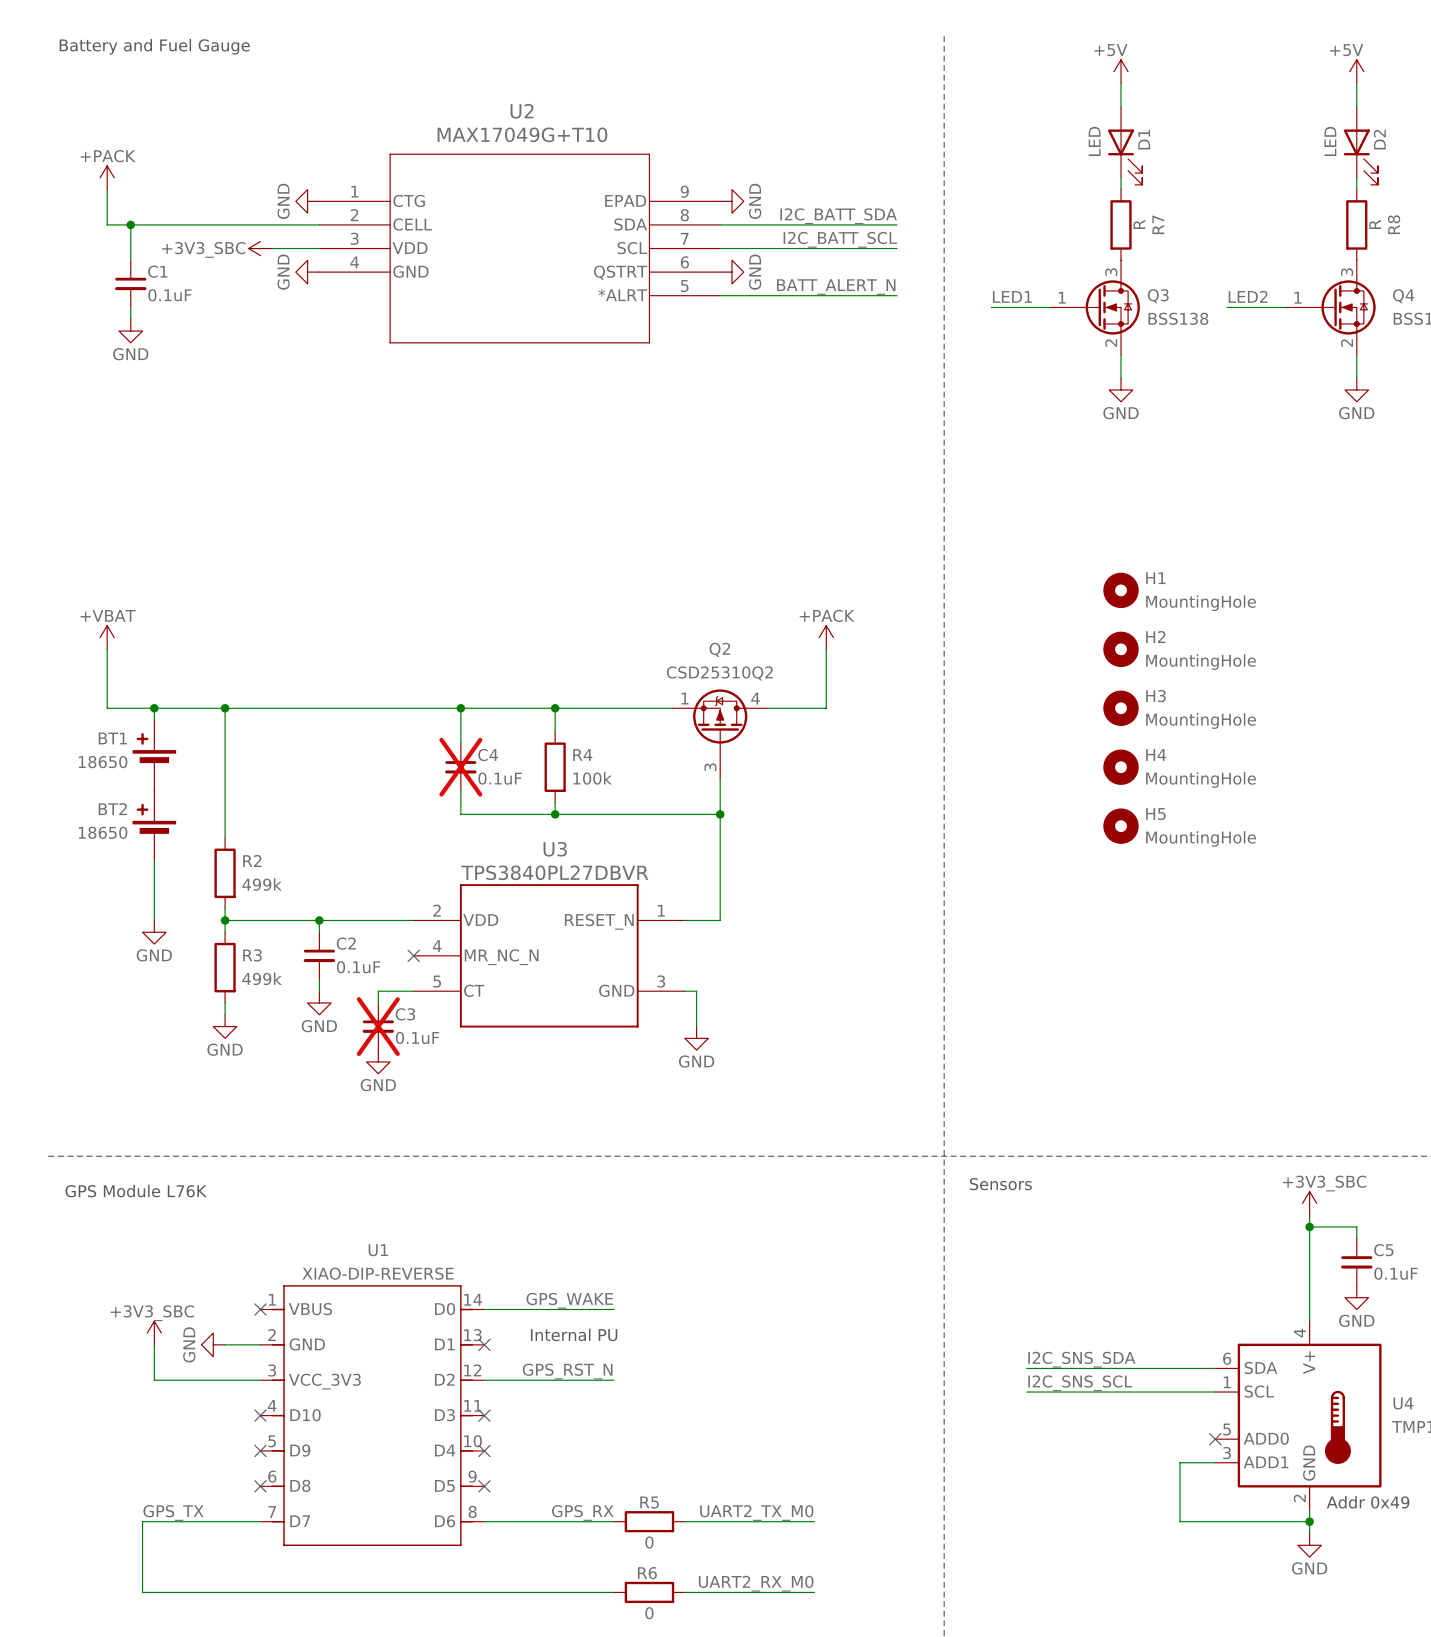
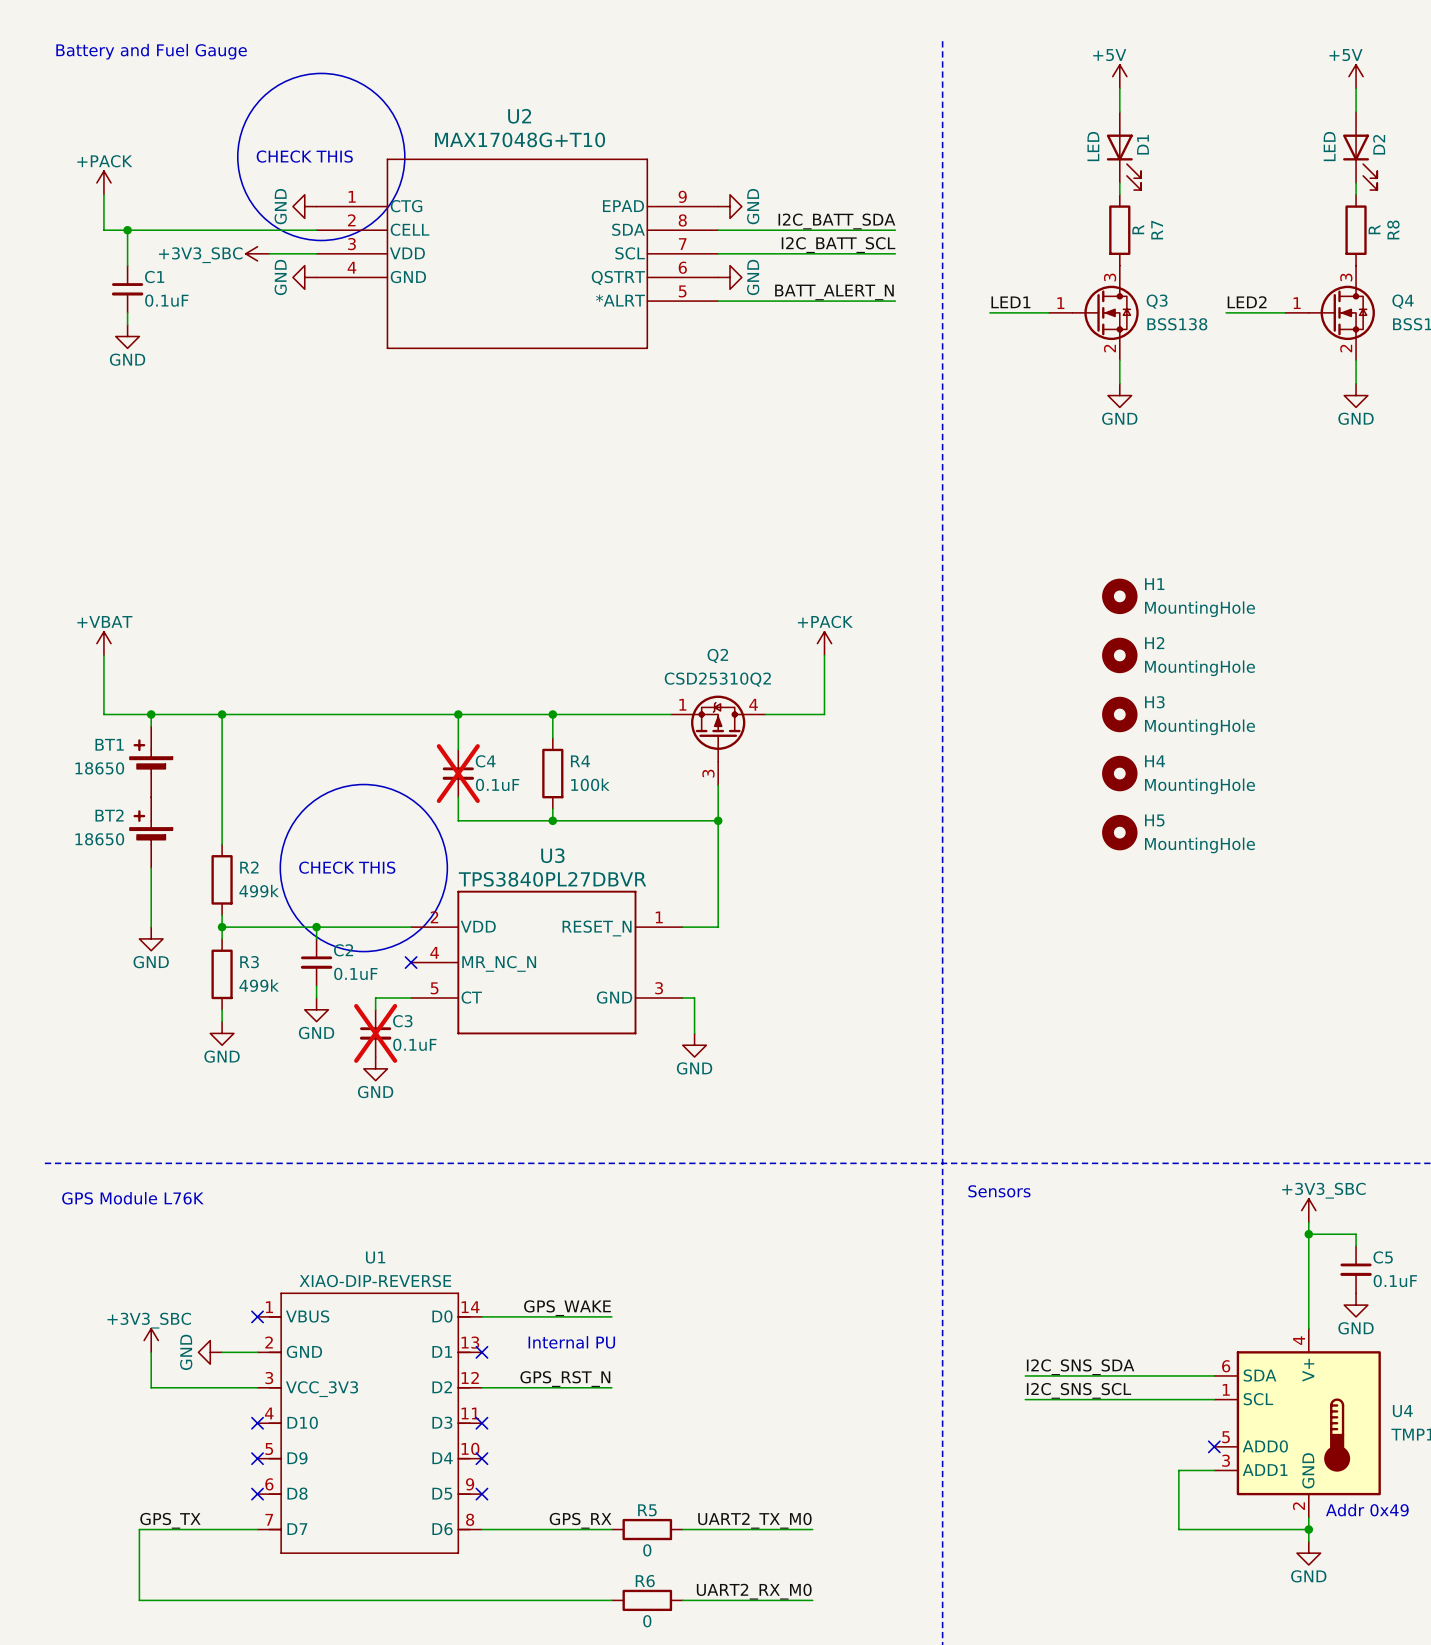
drawing: none -> [237, 73, 405, 241]
U2 value: MAX17049G+T10 (522, 134) -> MAX17048G+T10 (520, 139)
text: none -> CHECK THIS (304, 156)
drawing: none -> [280, 784, 448, 952]
text: none -> CHECK THIS (347, 867)

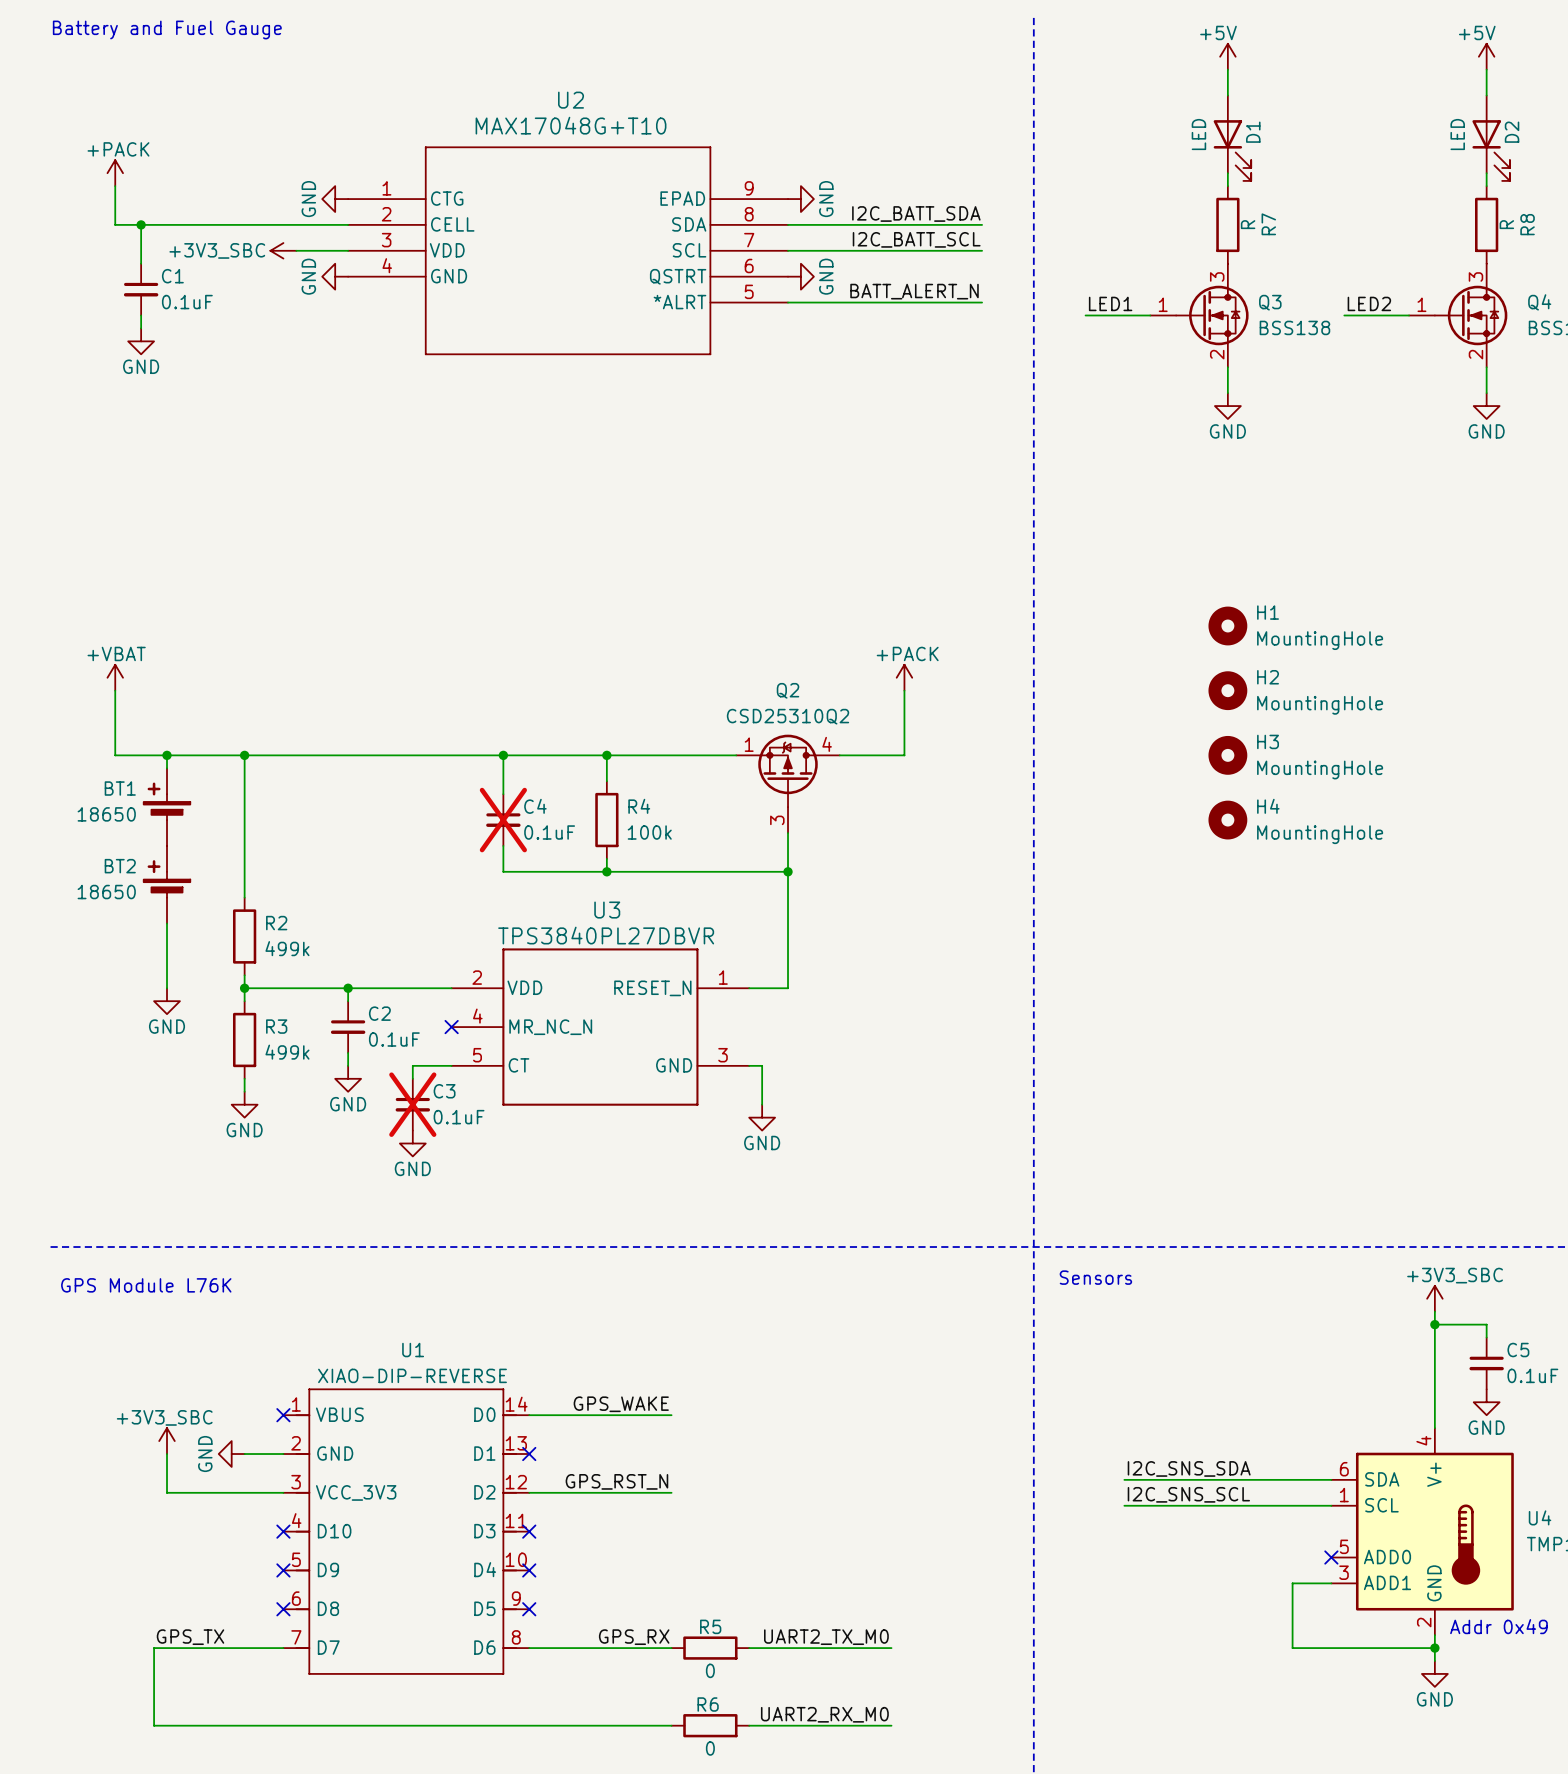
drawing: [237, 73, 405, 241] -> none
text: CHECK THIS (304, 156) -> none
drawing: [280, 784, 448, 952] -> none
H5: MountingHole (1119, 832) -> none
text: CHECK THIS (347, 867) -> none
text: Internal PU (571, 1342) -> none

